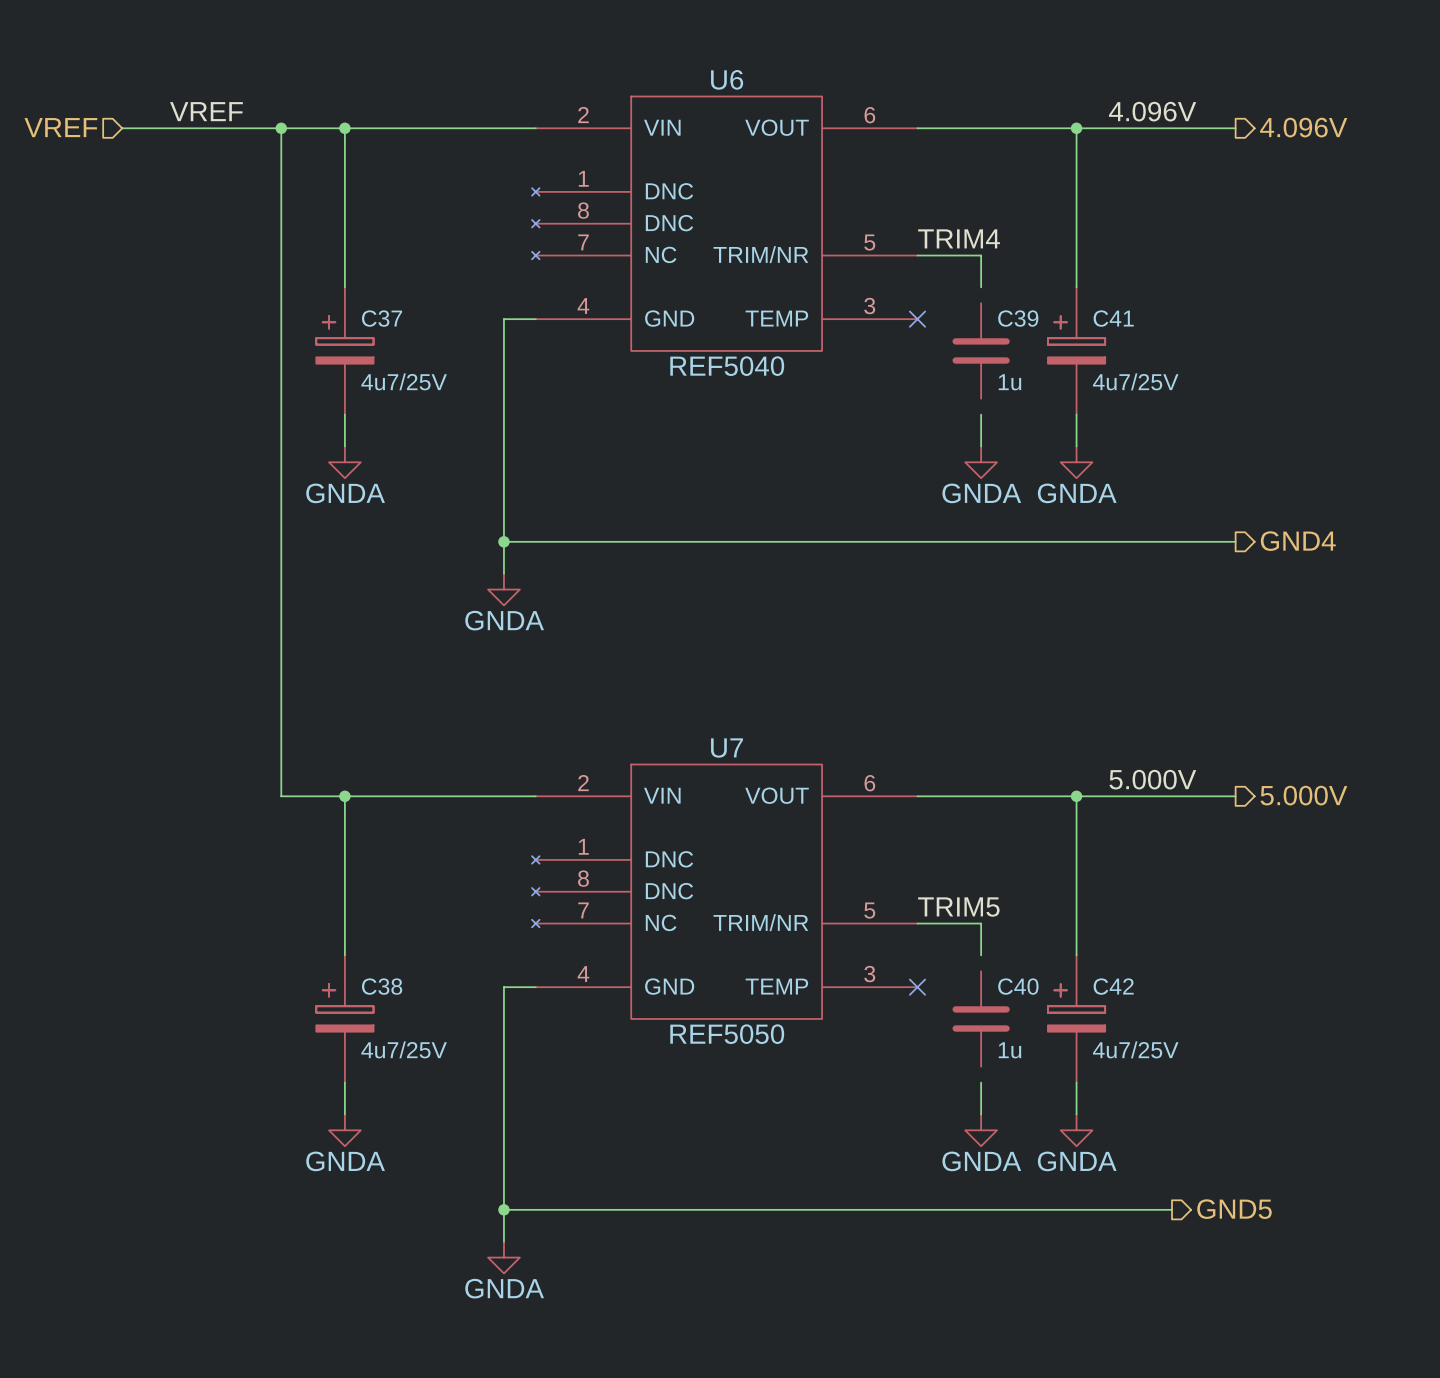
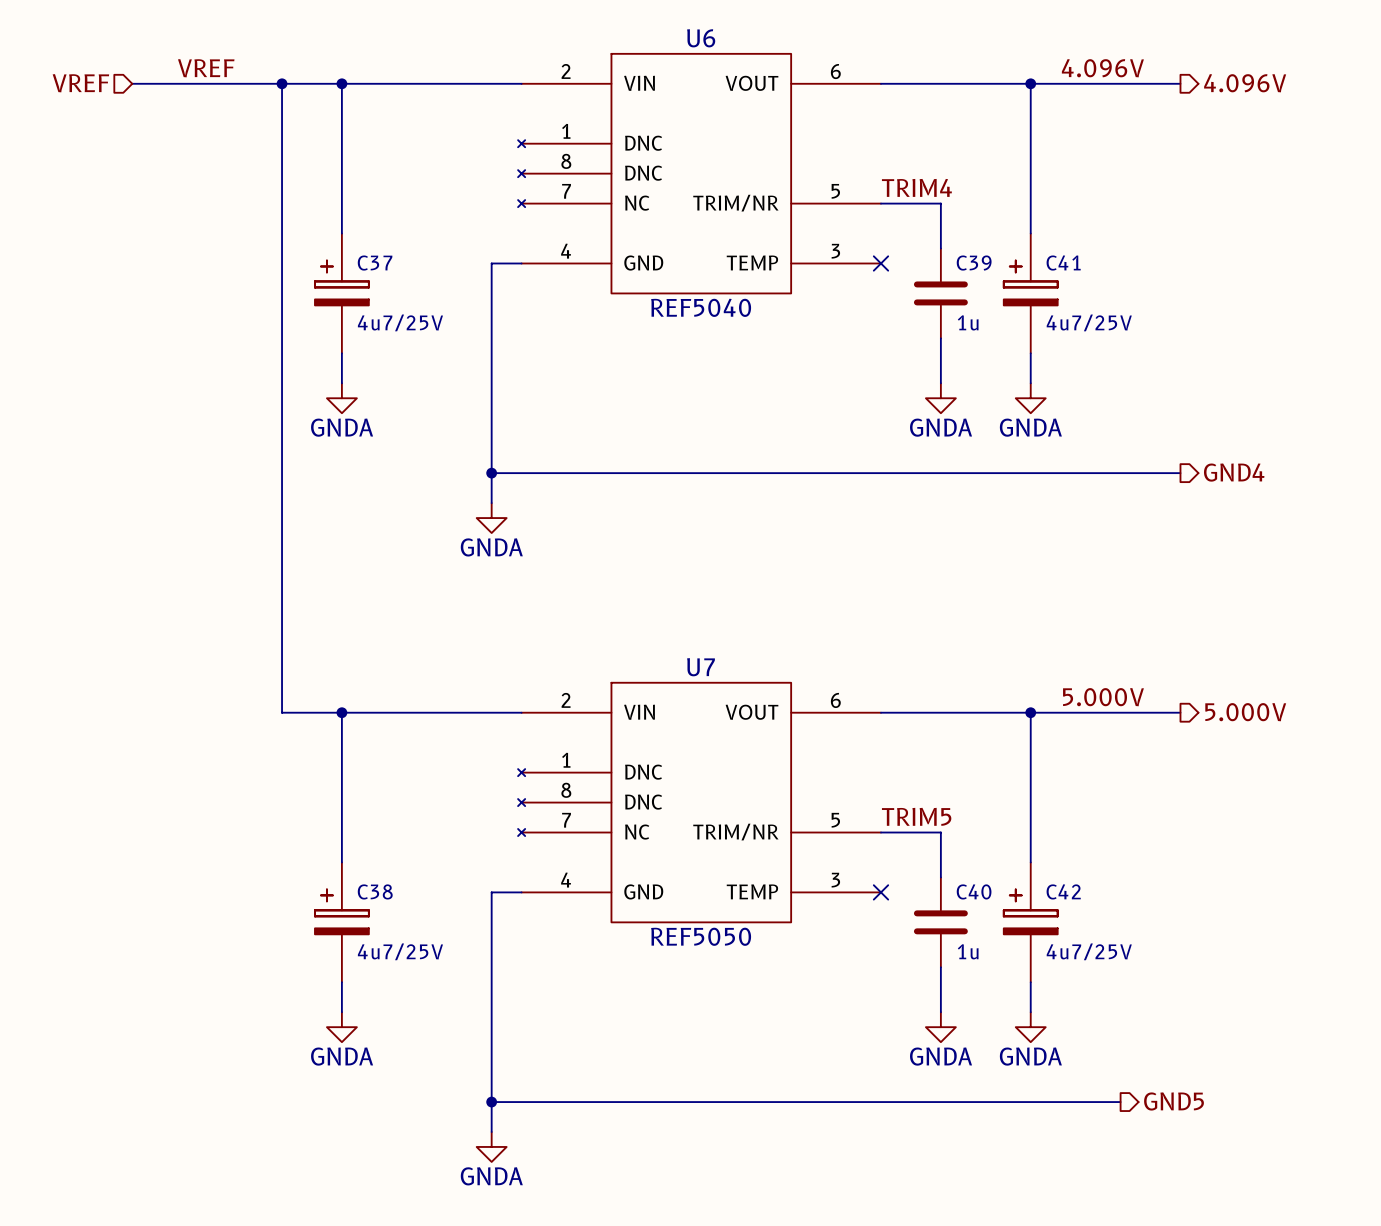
wire: none -> (940, 233) (940, 248)
wire: none -> (940, 338) (940, 353)
wire: none -> (940, 862) (940, 877)
wire: none -> (940, 967) (940, 982)

